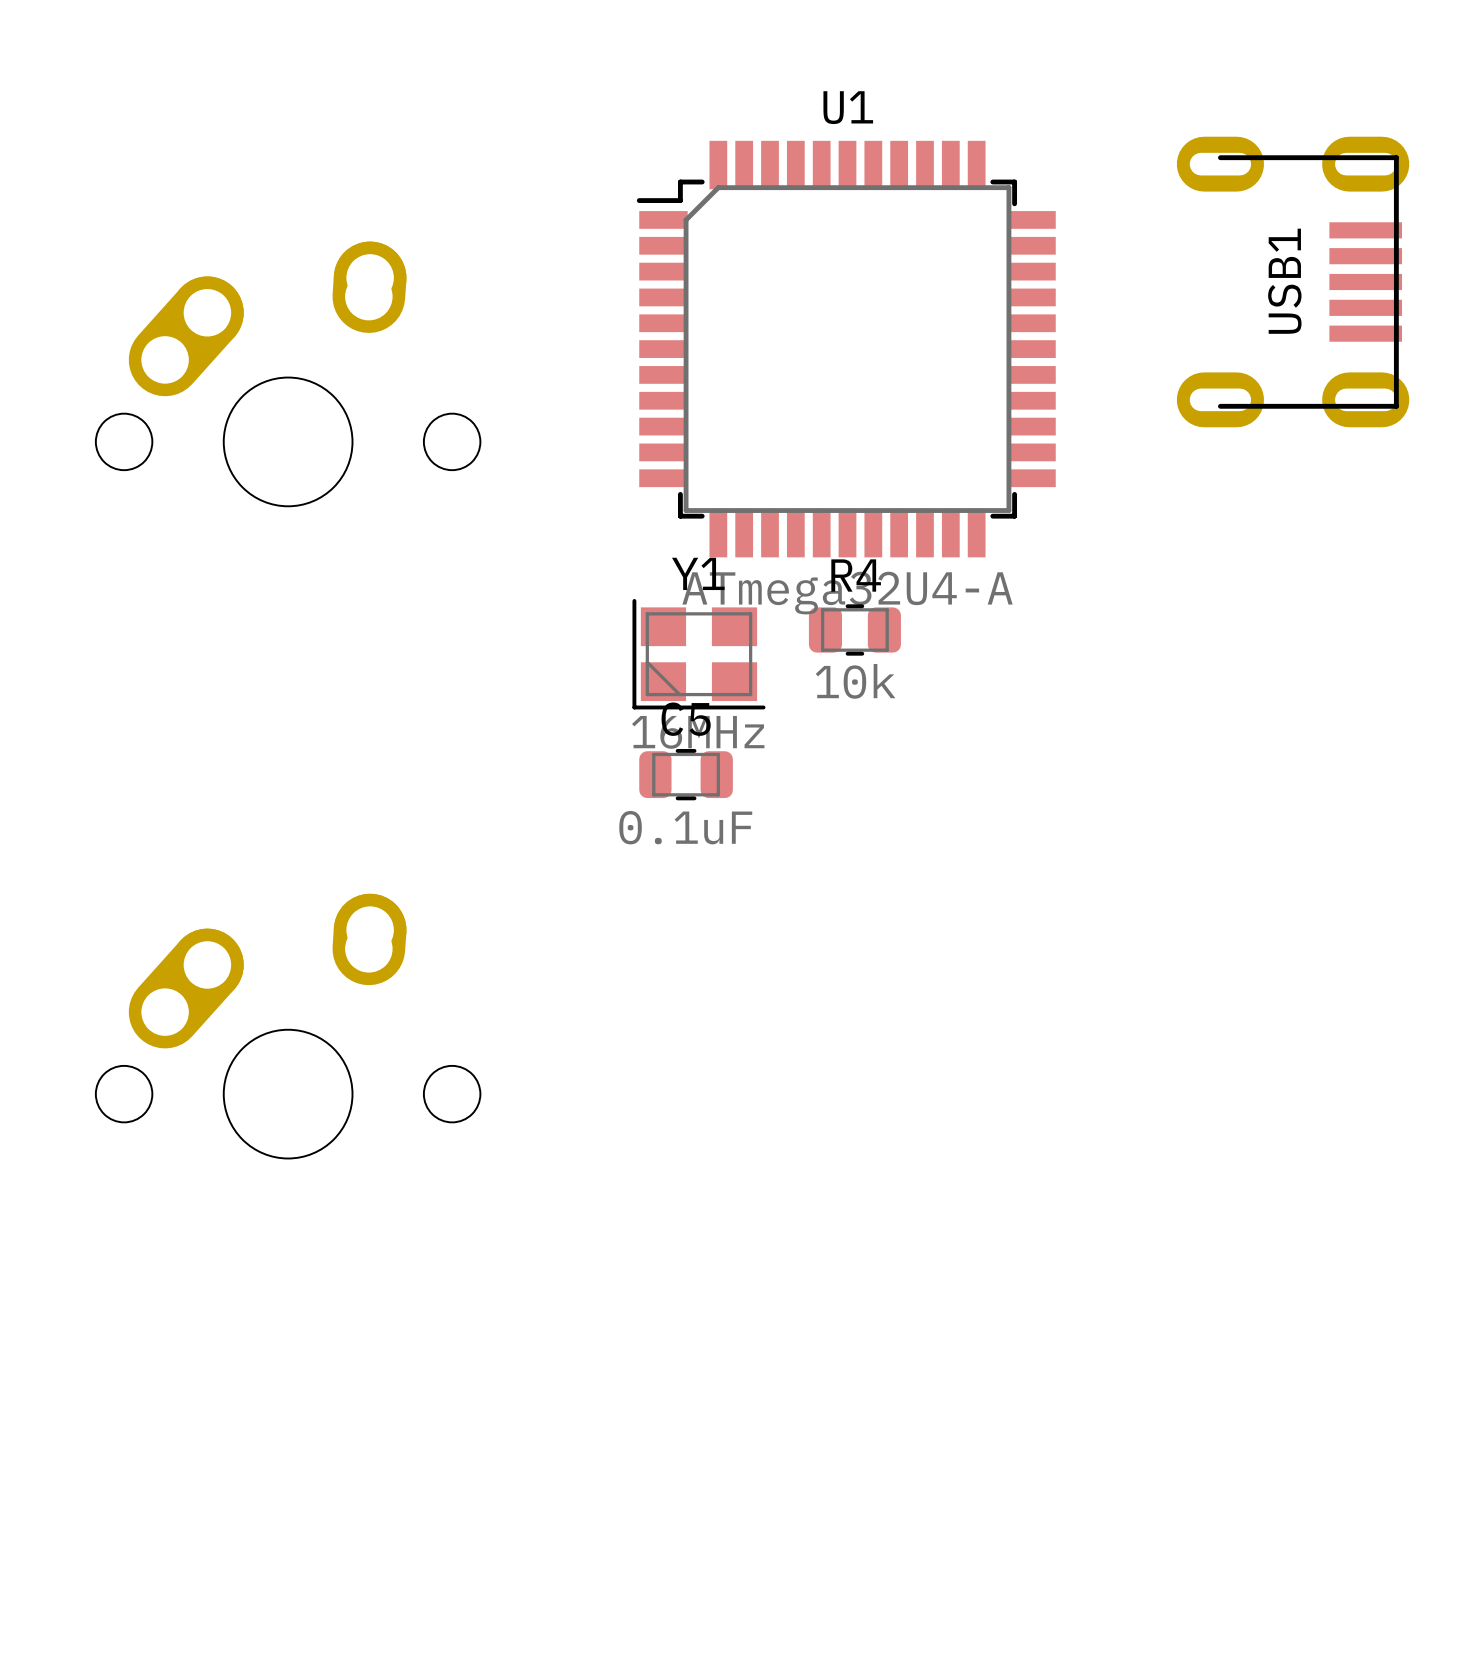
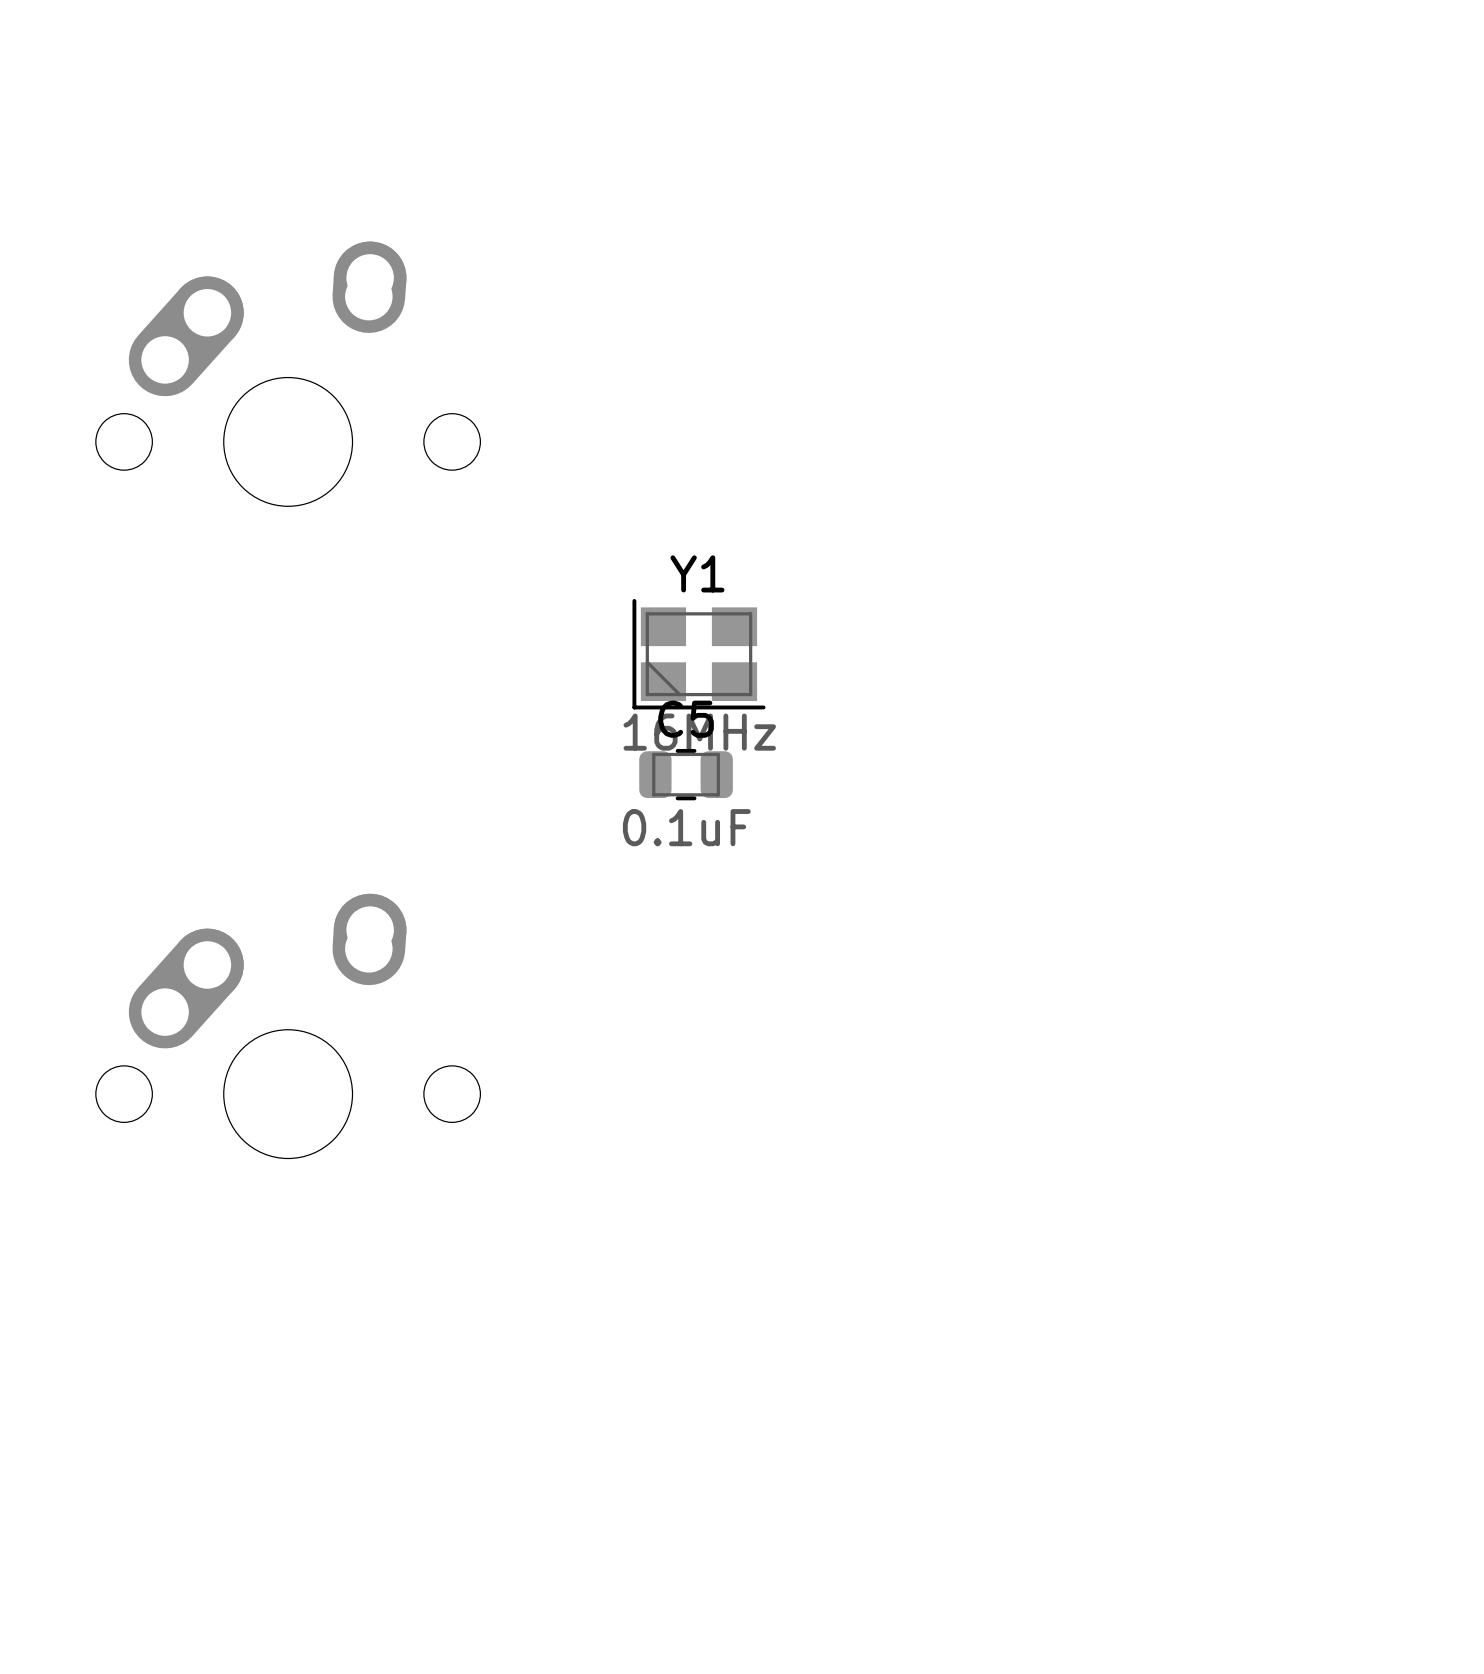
USB1: (1293, 282) -> none
U1: ATmega32U4-A (846, 349) -> none
R4: 10k (854, 629) -> none

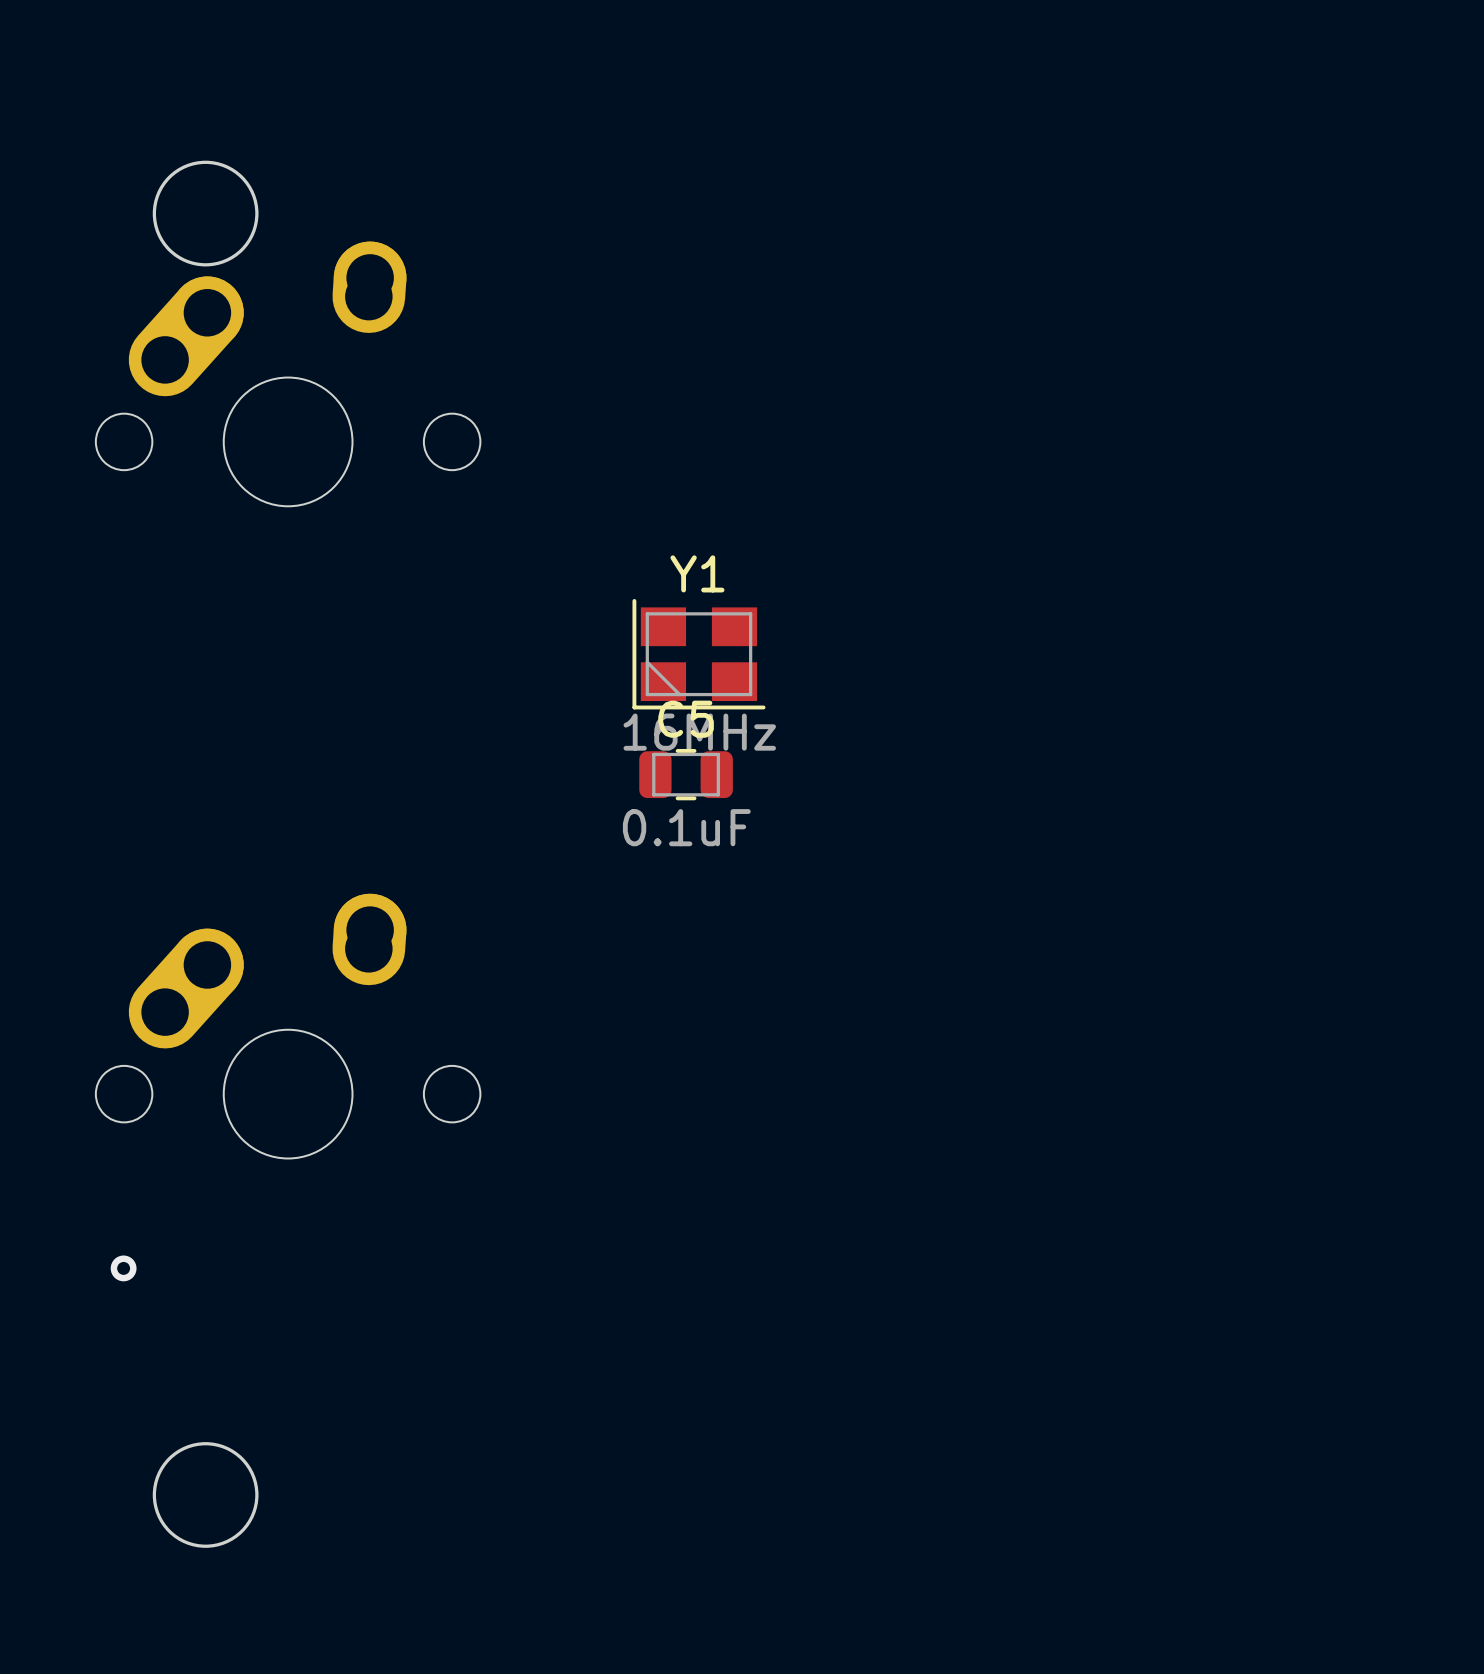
round board edge: none -> [152, 160, 259, 267]
via: none -> (123, 1268)
round board edge: none -> [152, 1442, 259, 1548]

